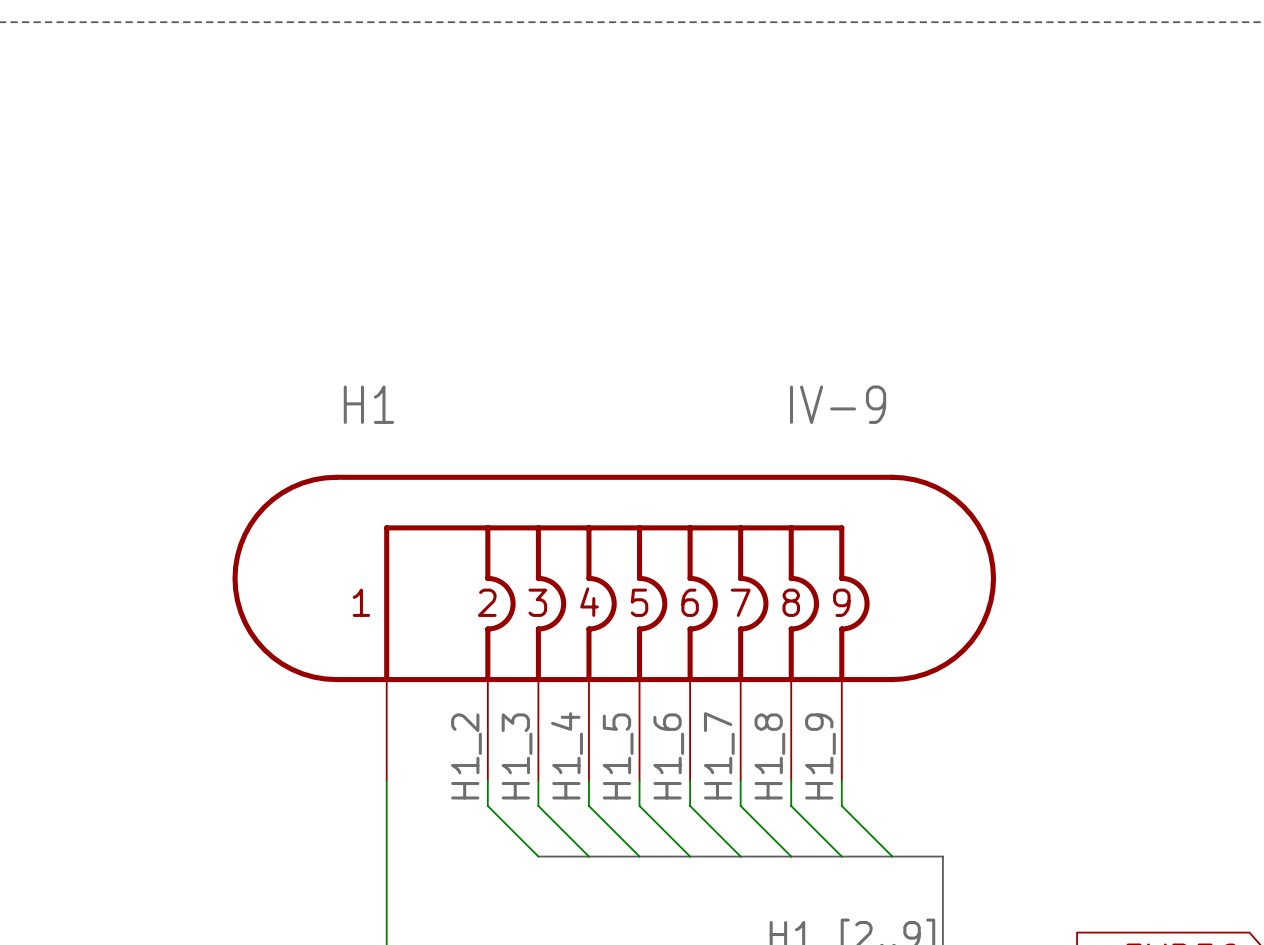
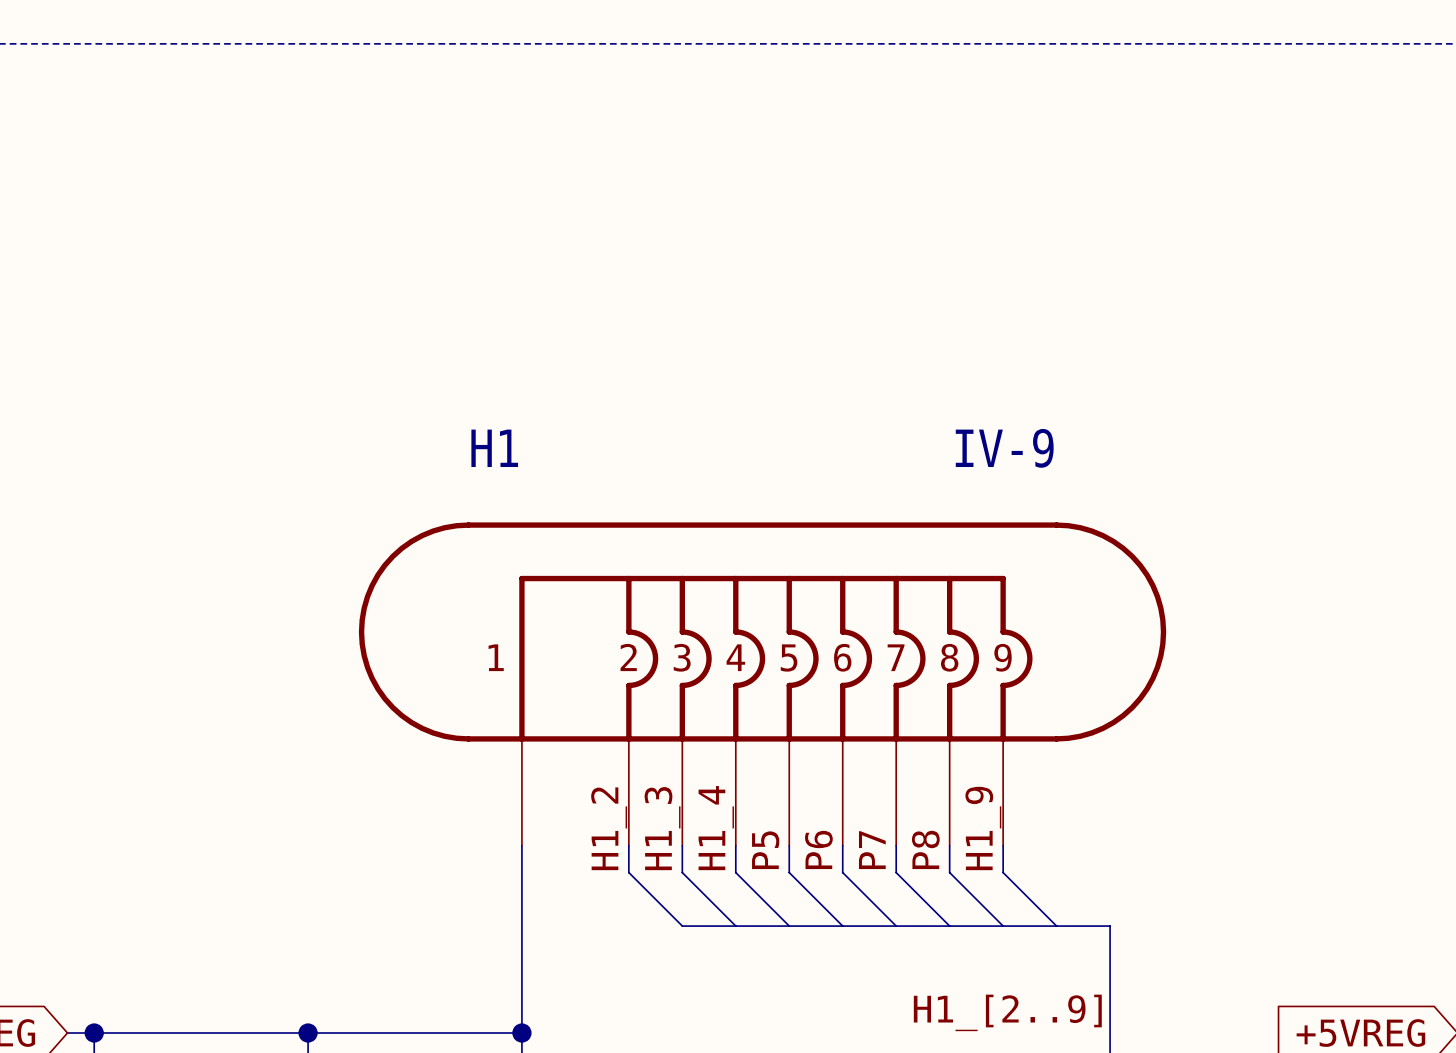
label: H1_7 (719, 755) -> P7 (872, 850)
label: H1_5 (618, 756) -> P5 (765, 850)
label: H1_6 (668, 756) -> P6 (818, 849)
label: H1_8 (769, 756) -> P8 (925, 849)

